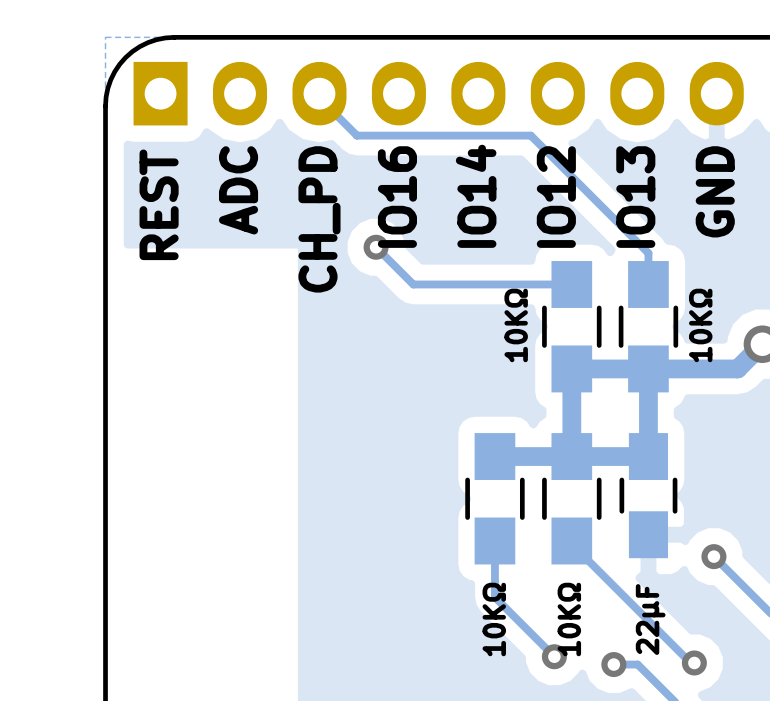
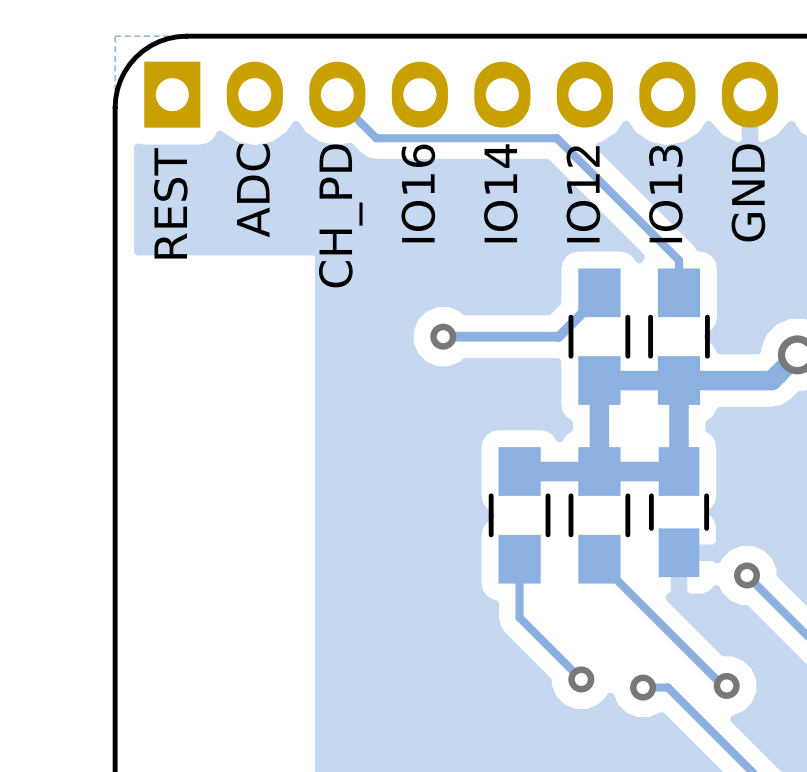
track: (376, 247) (413, 284) (571, 284) -> (443, 336) (558, 336) (599, 296) (599, 292)
via position: (376, 247) -> (443, 336)
text: 10KΩ (516, 325) -> none
text: 10KΩ (700, 325) -> none
text: 10KΩ (494, 619) -> none
text: 10KΩ (569, 619) -> none
text: 22μF (650, 619) -> none

